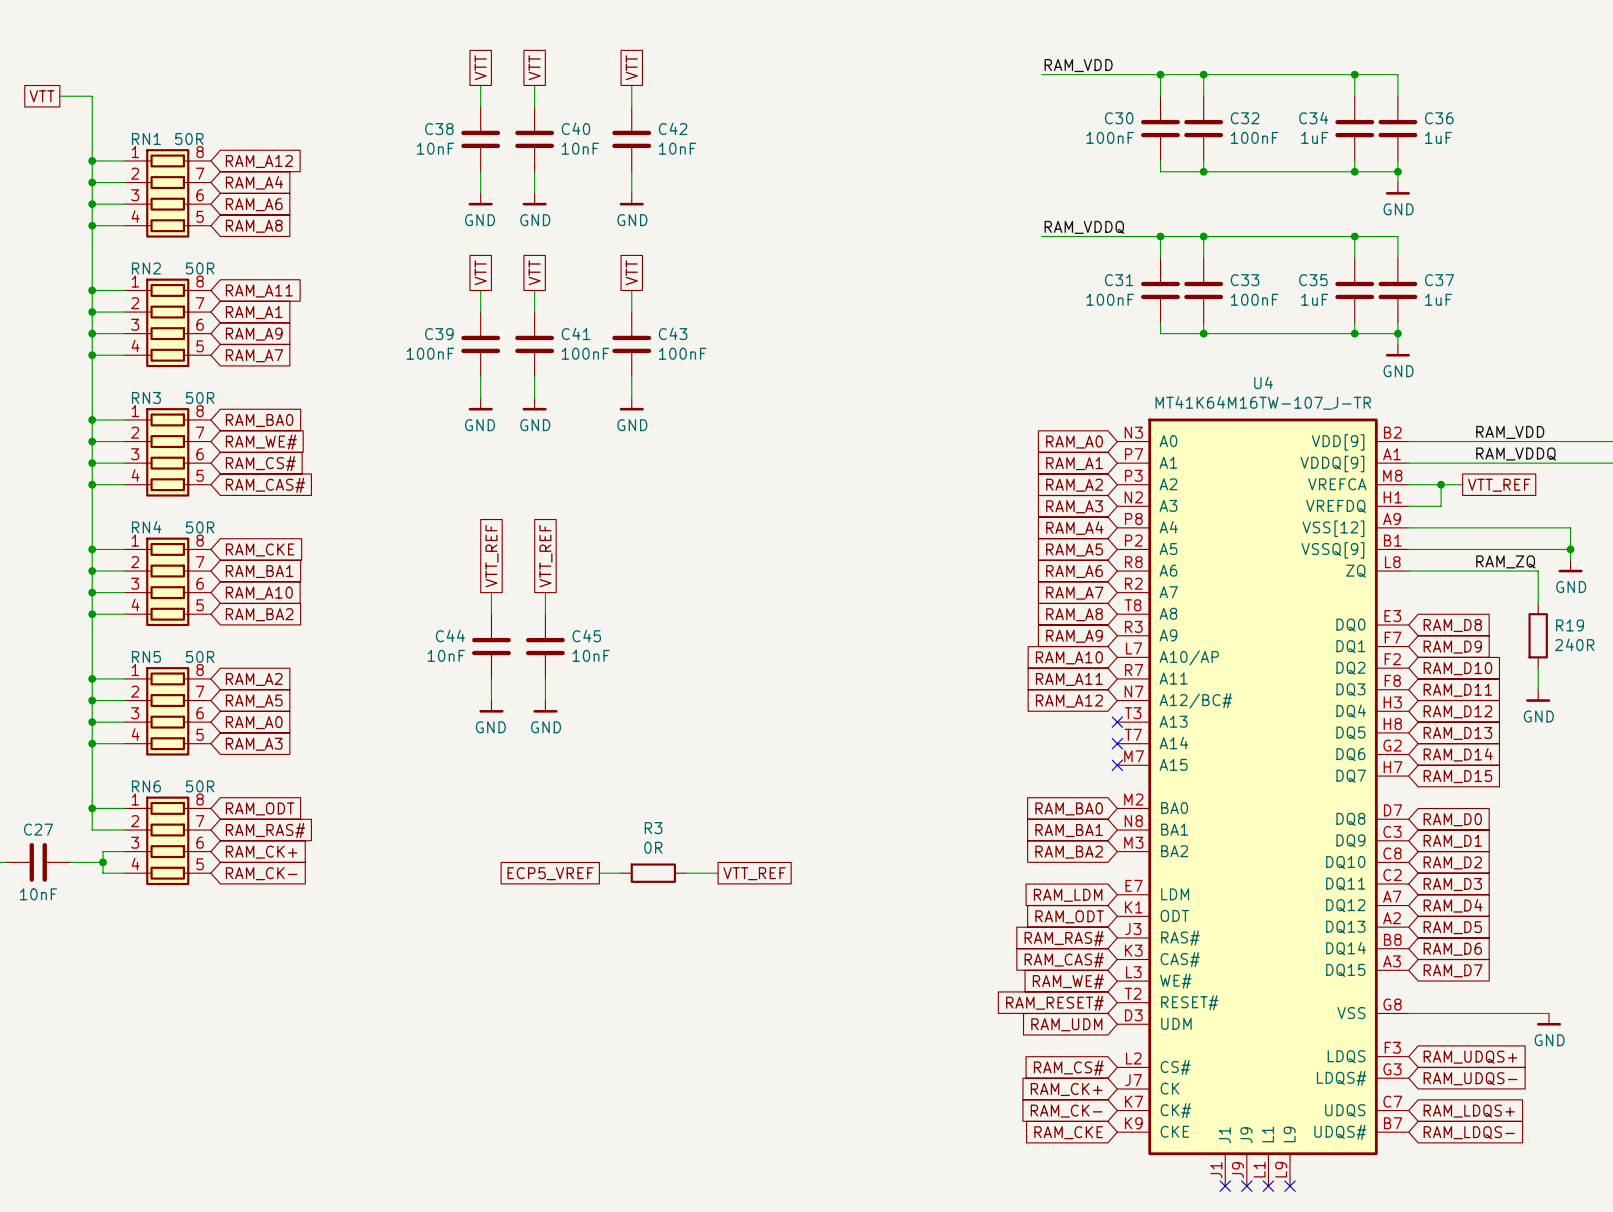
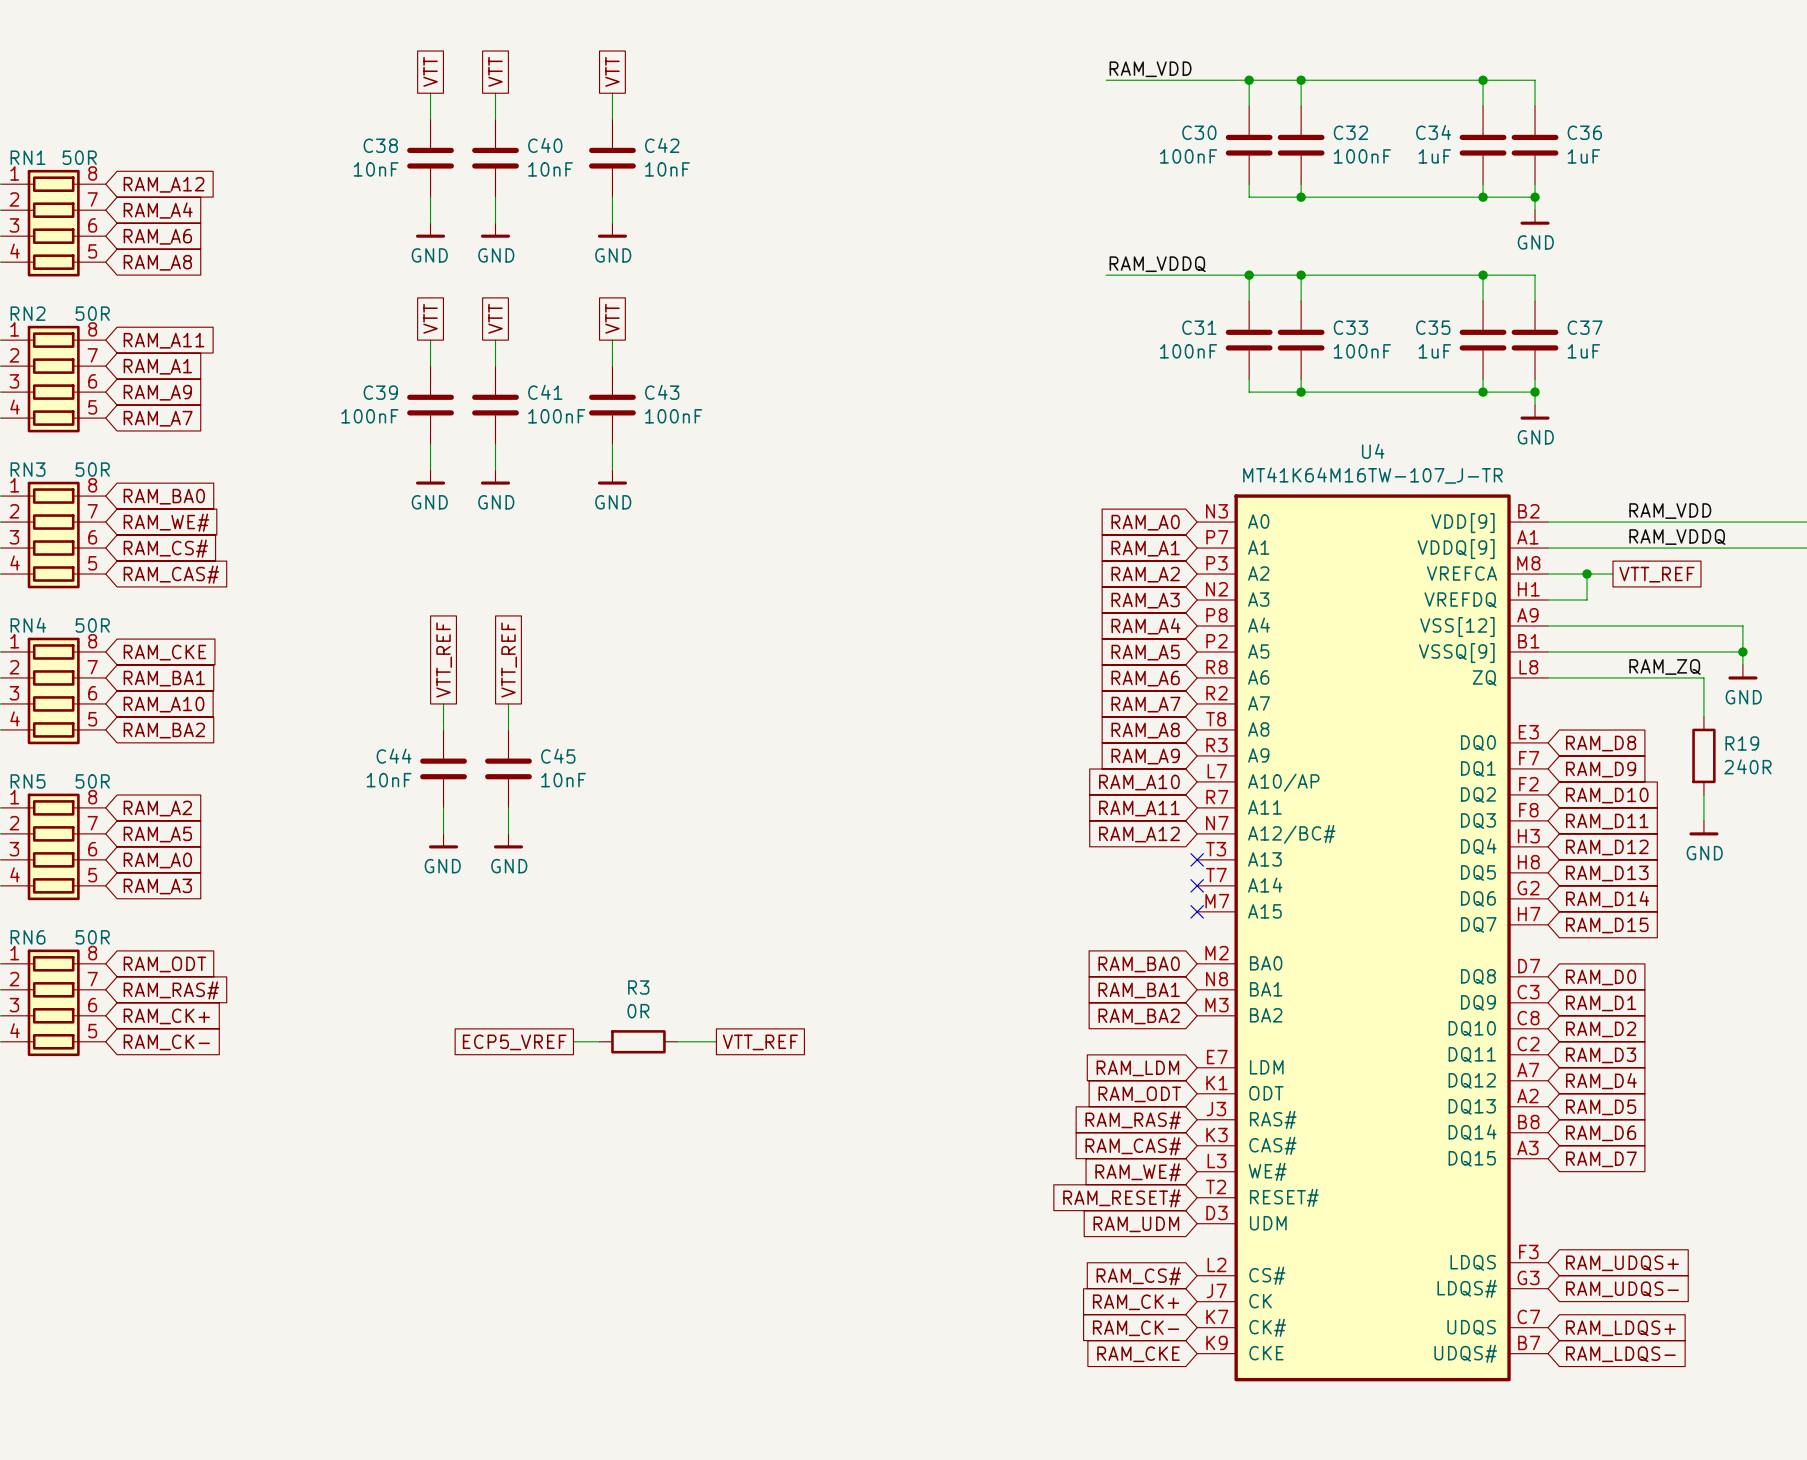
U4 symbol: [1117, 418, 1409, 1187] -> [1197, 494, 1549, 1382]
wire: (1408, 1013) (1548, 1013) -> none
power symbol: GND (1548, 1019) -> none
no-connect mark: (1225, 1186) -> none
no-connect mark: (1246, 1186) -> none
no-connect mark: (1268, 1186) -> none
no-connect mark: (1290, 1186) -> none

